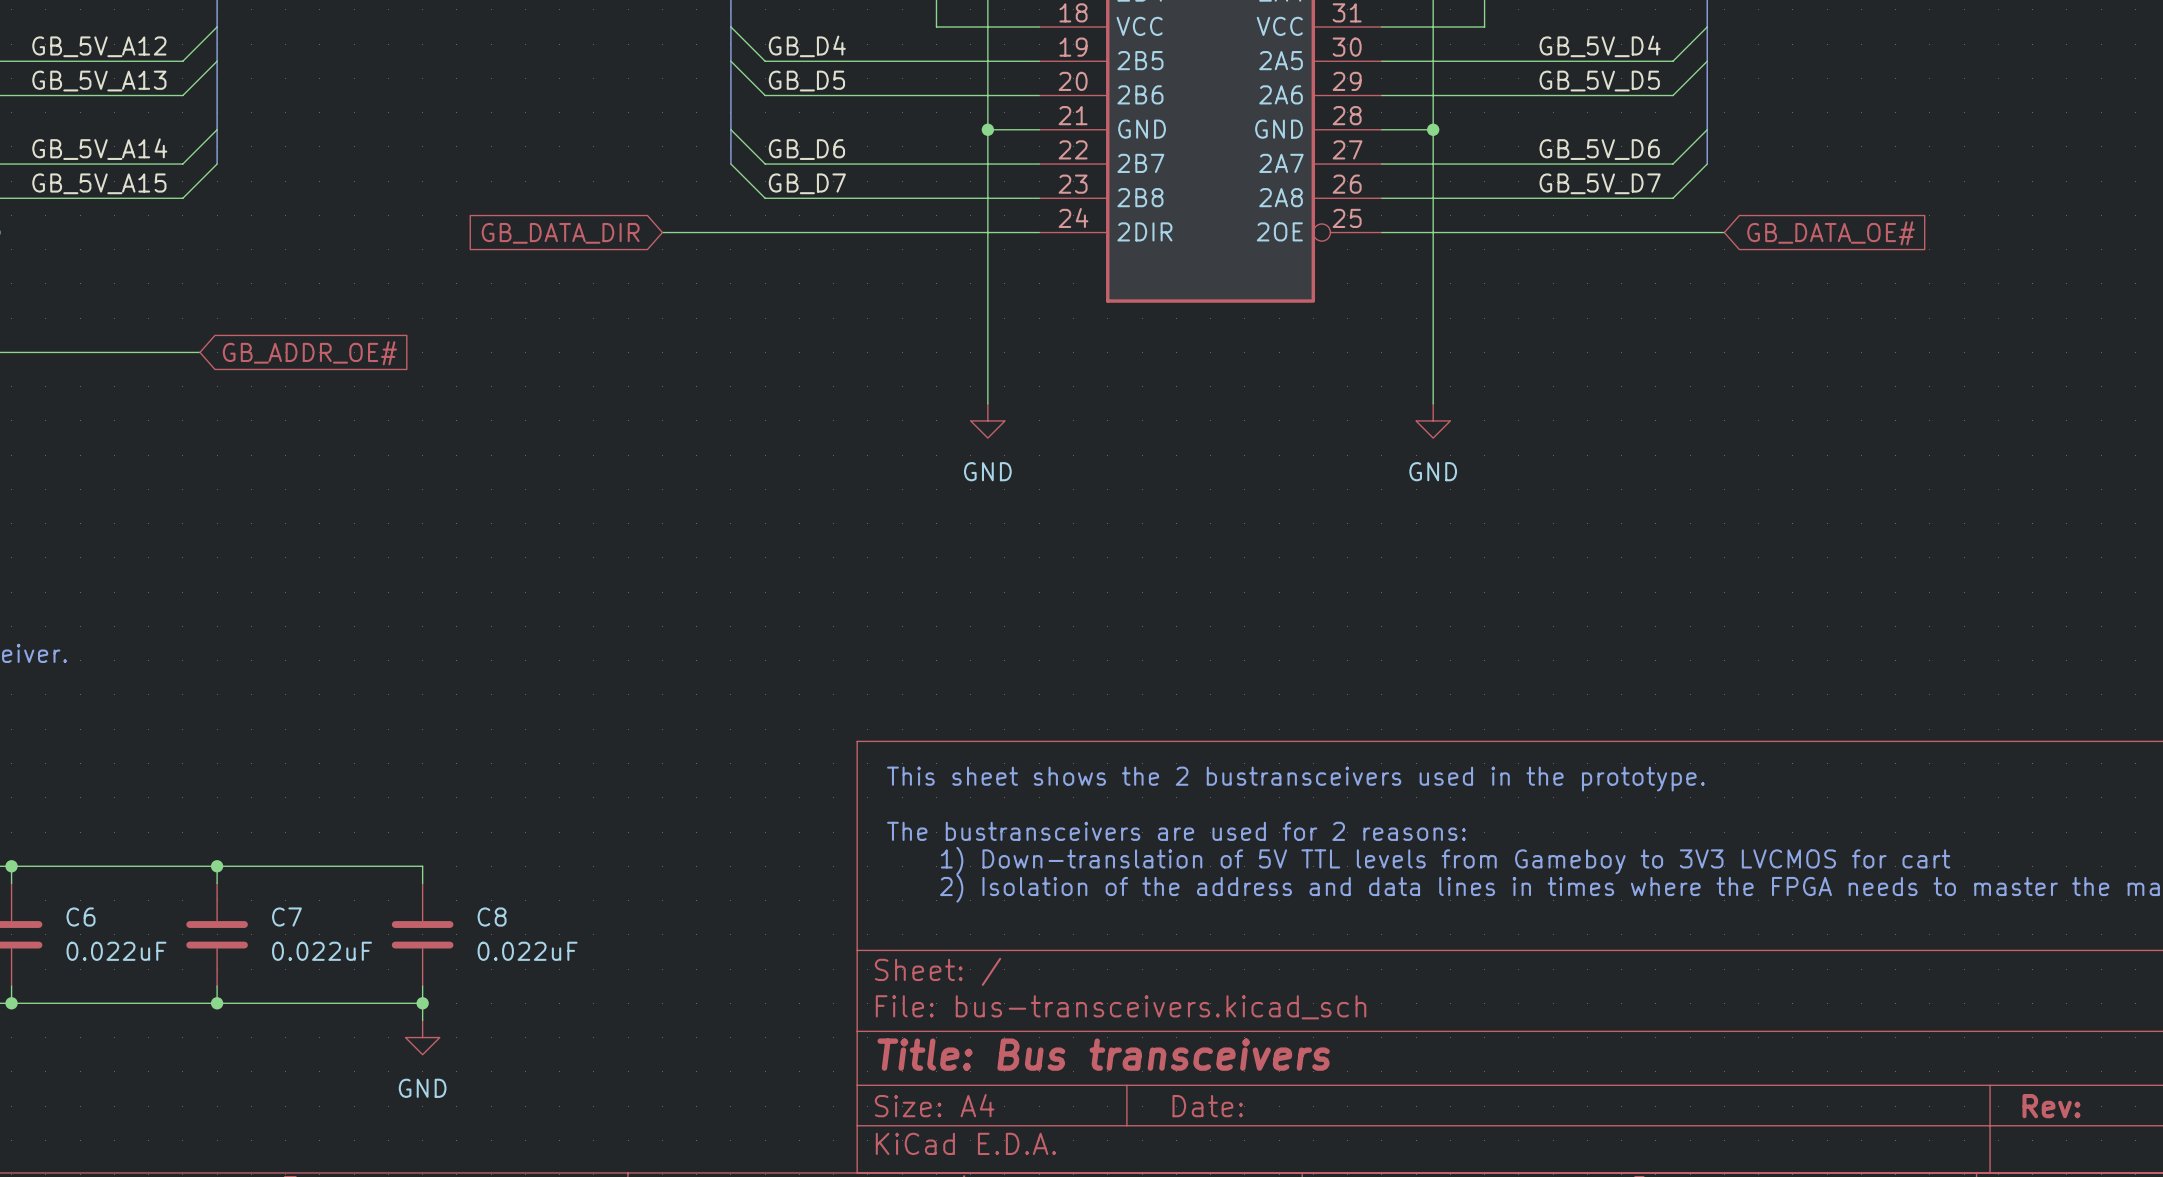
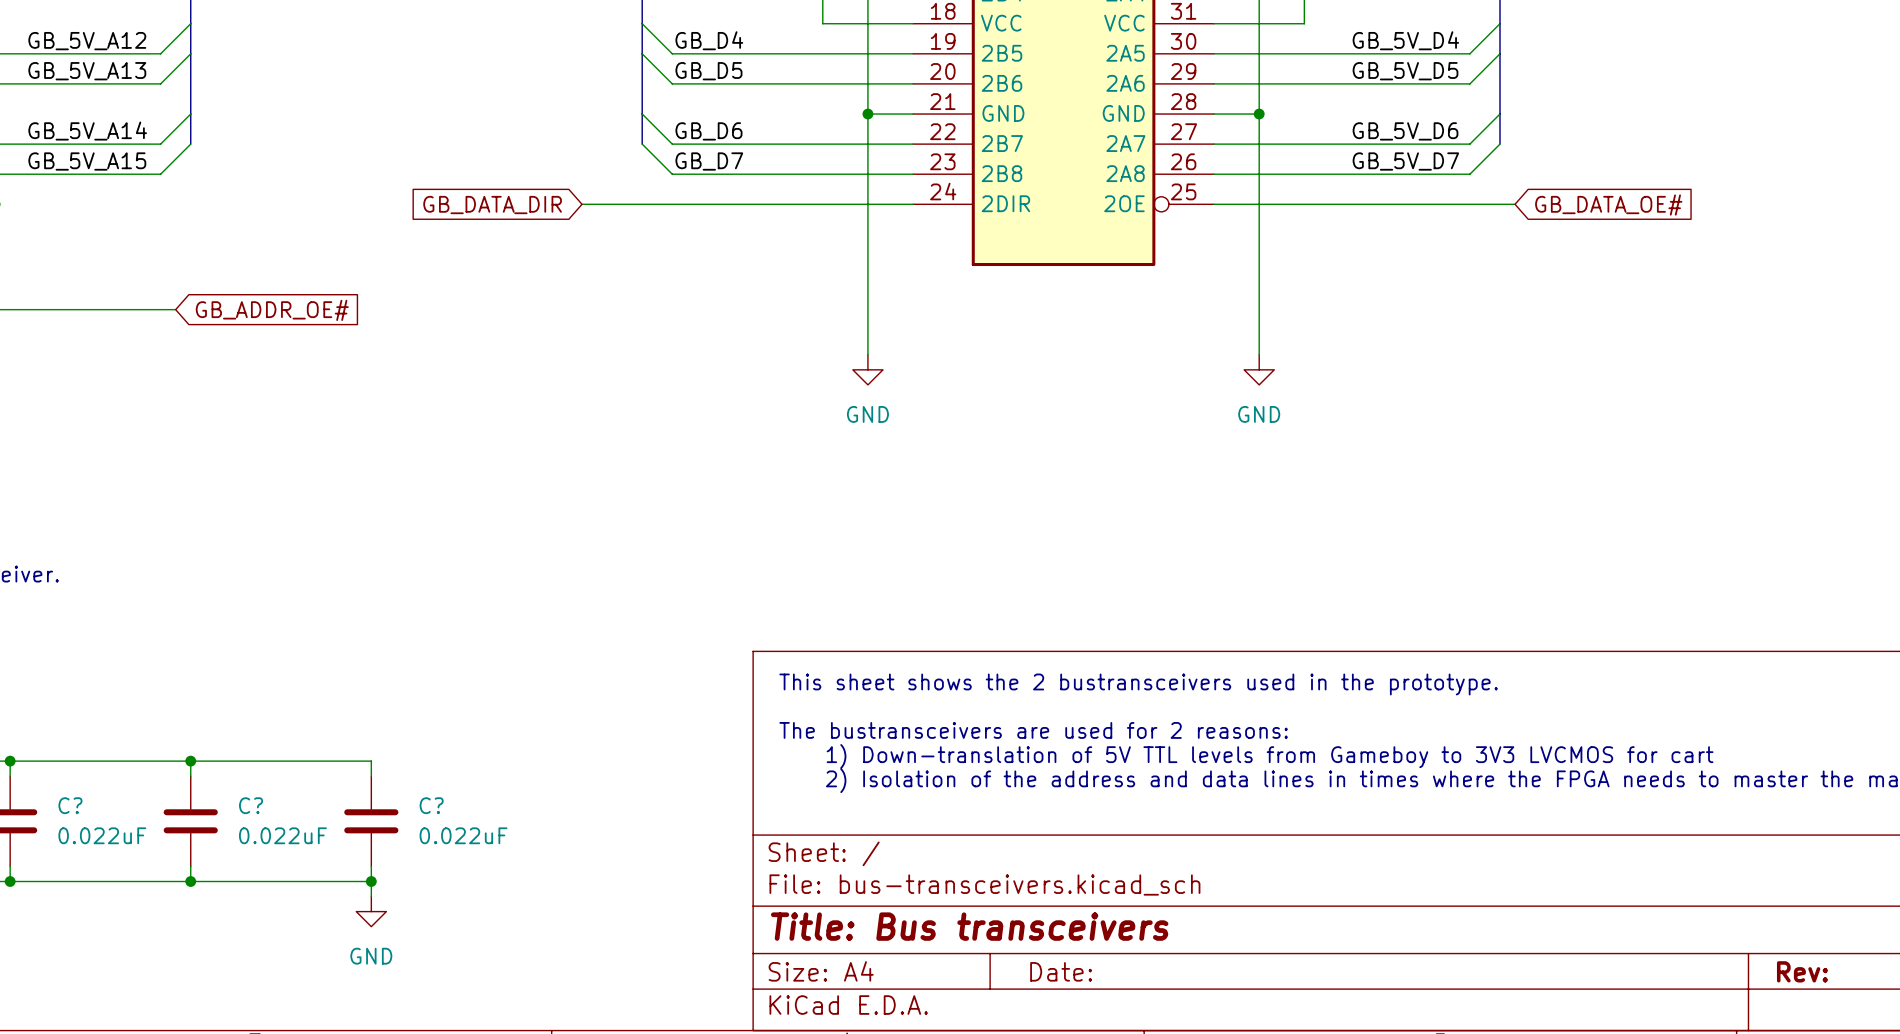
C6 name: C6 (81, 917) -> C? (70, 805)
C7 name: C7 (286, 917) -> C? (251, 805)
C8 name: C8 (492, 917) -> C? (431, 805)

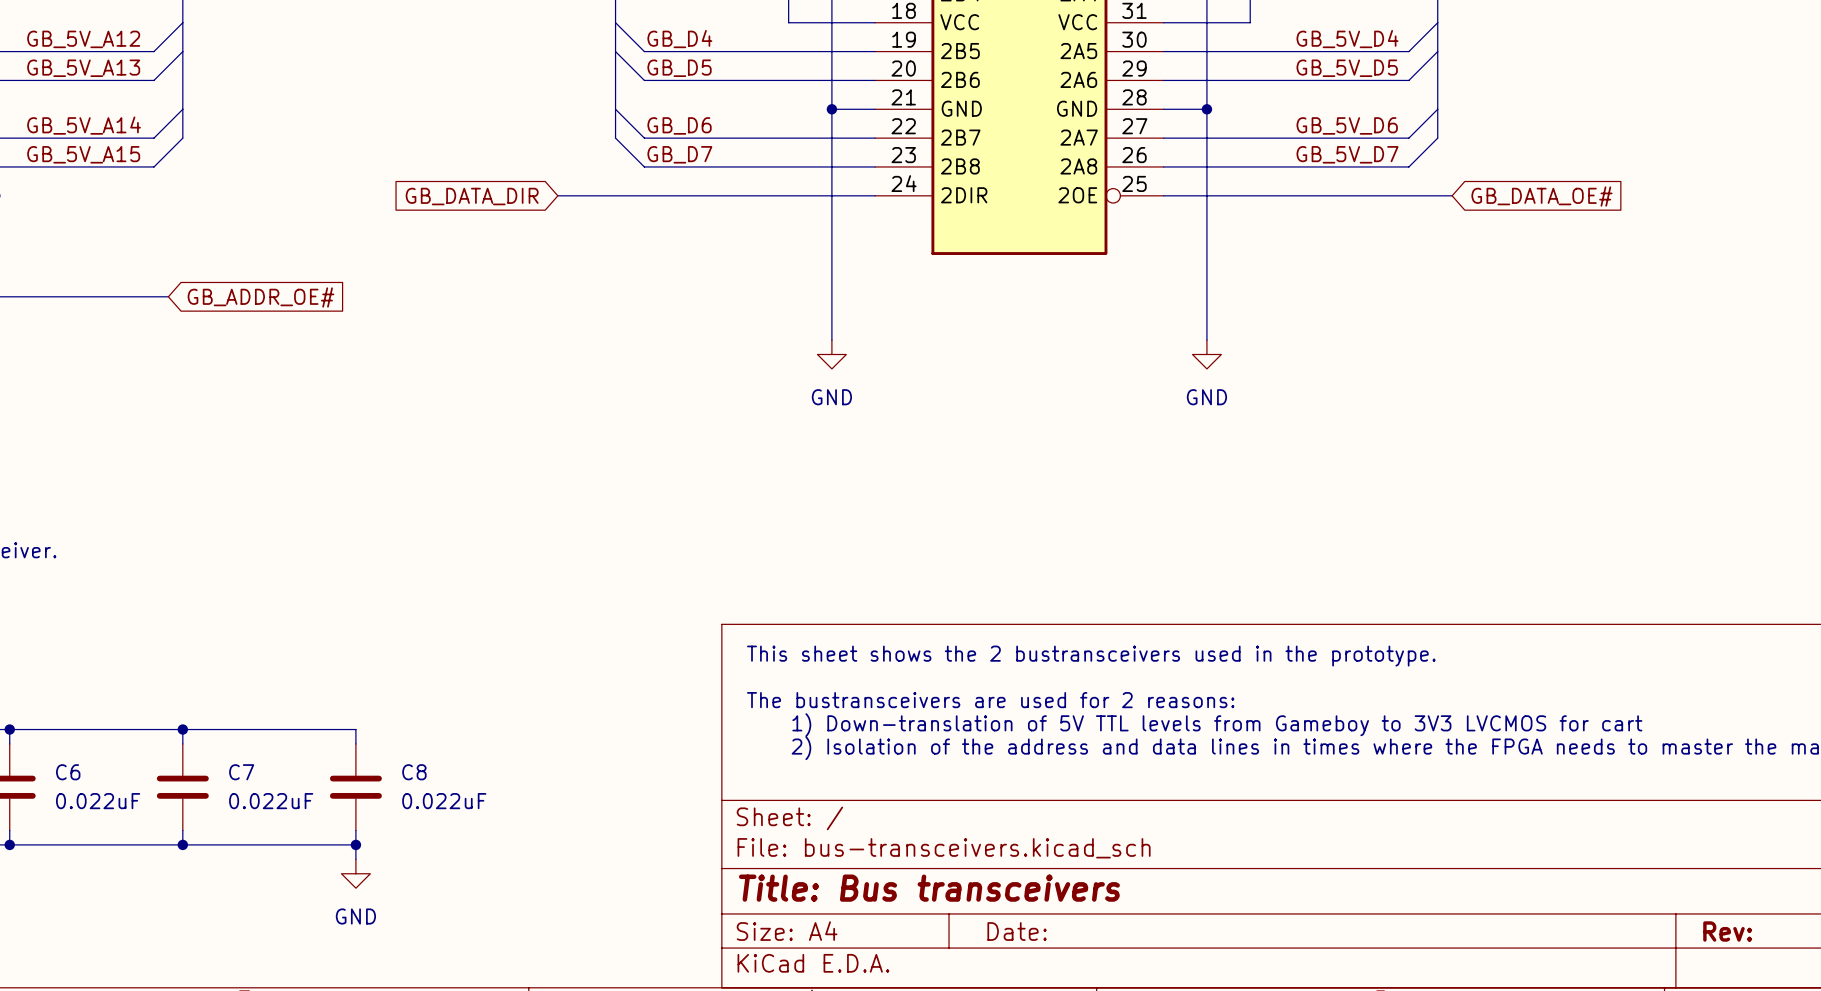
C? name: C? (70, 805) -> C6 (68, 772)
C? name: C? (251, 805) -> C7 (241, 772)
C? name: C? (431, 805) -> C8 (414, 772)

